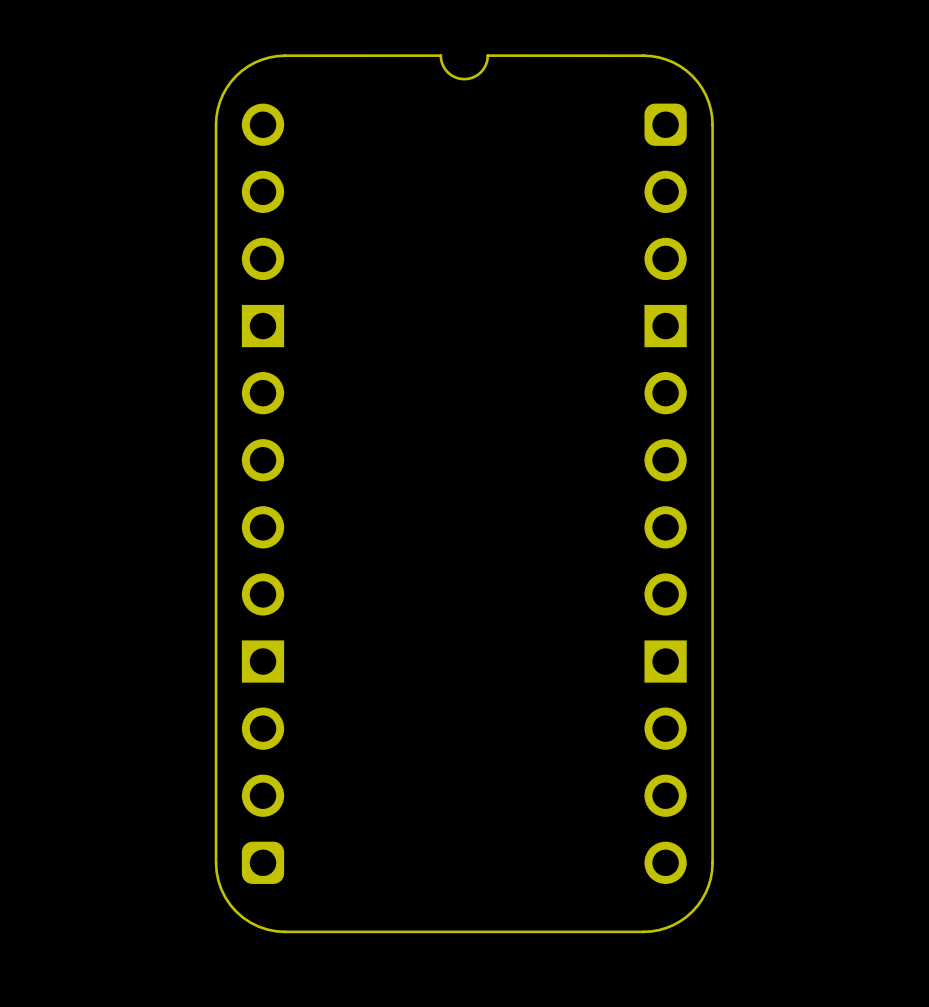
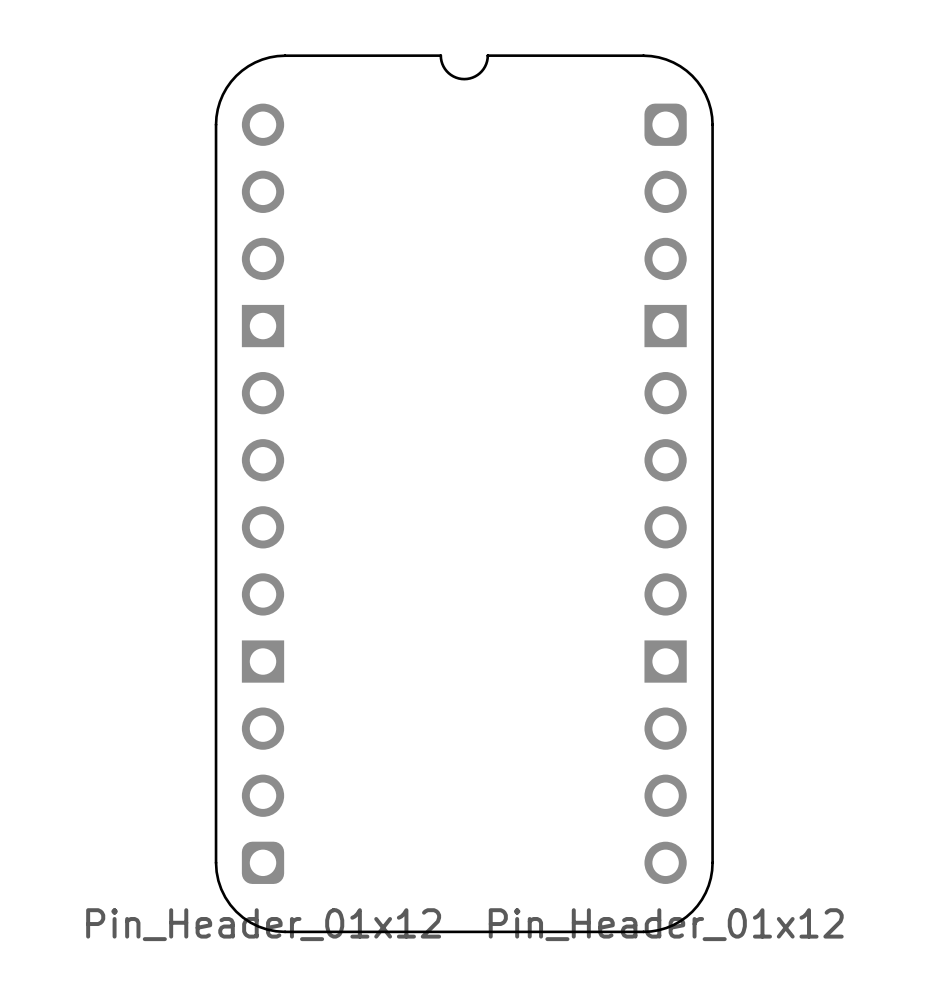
drawing: none -> [86, 908, 844, 942]

